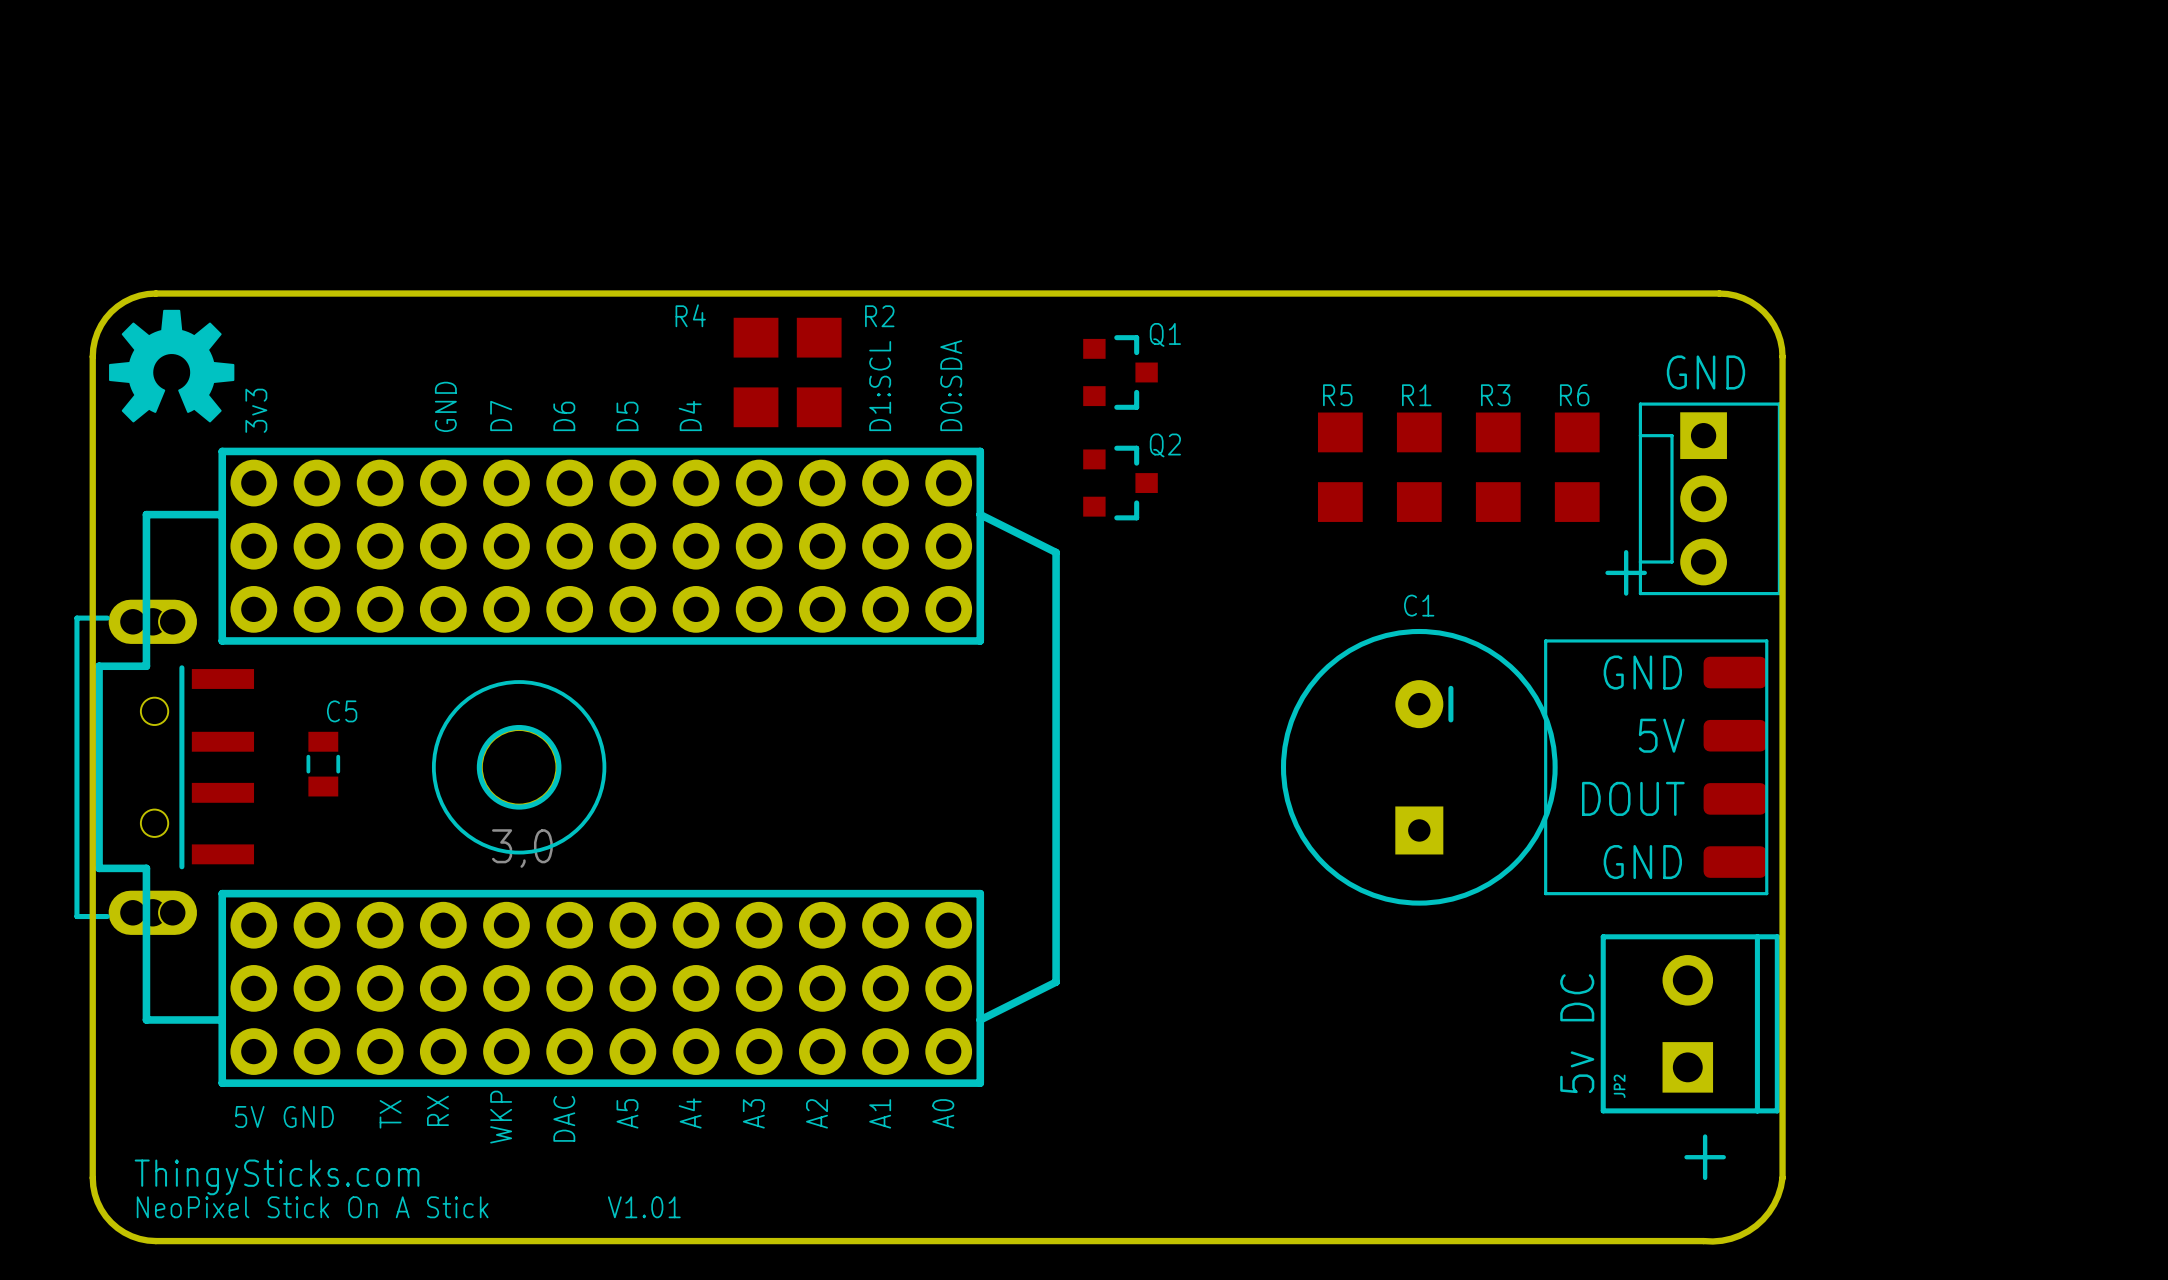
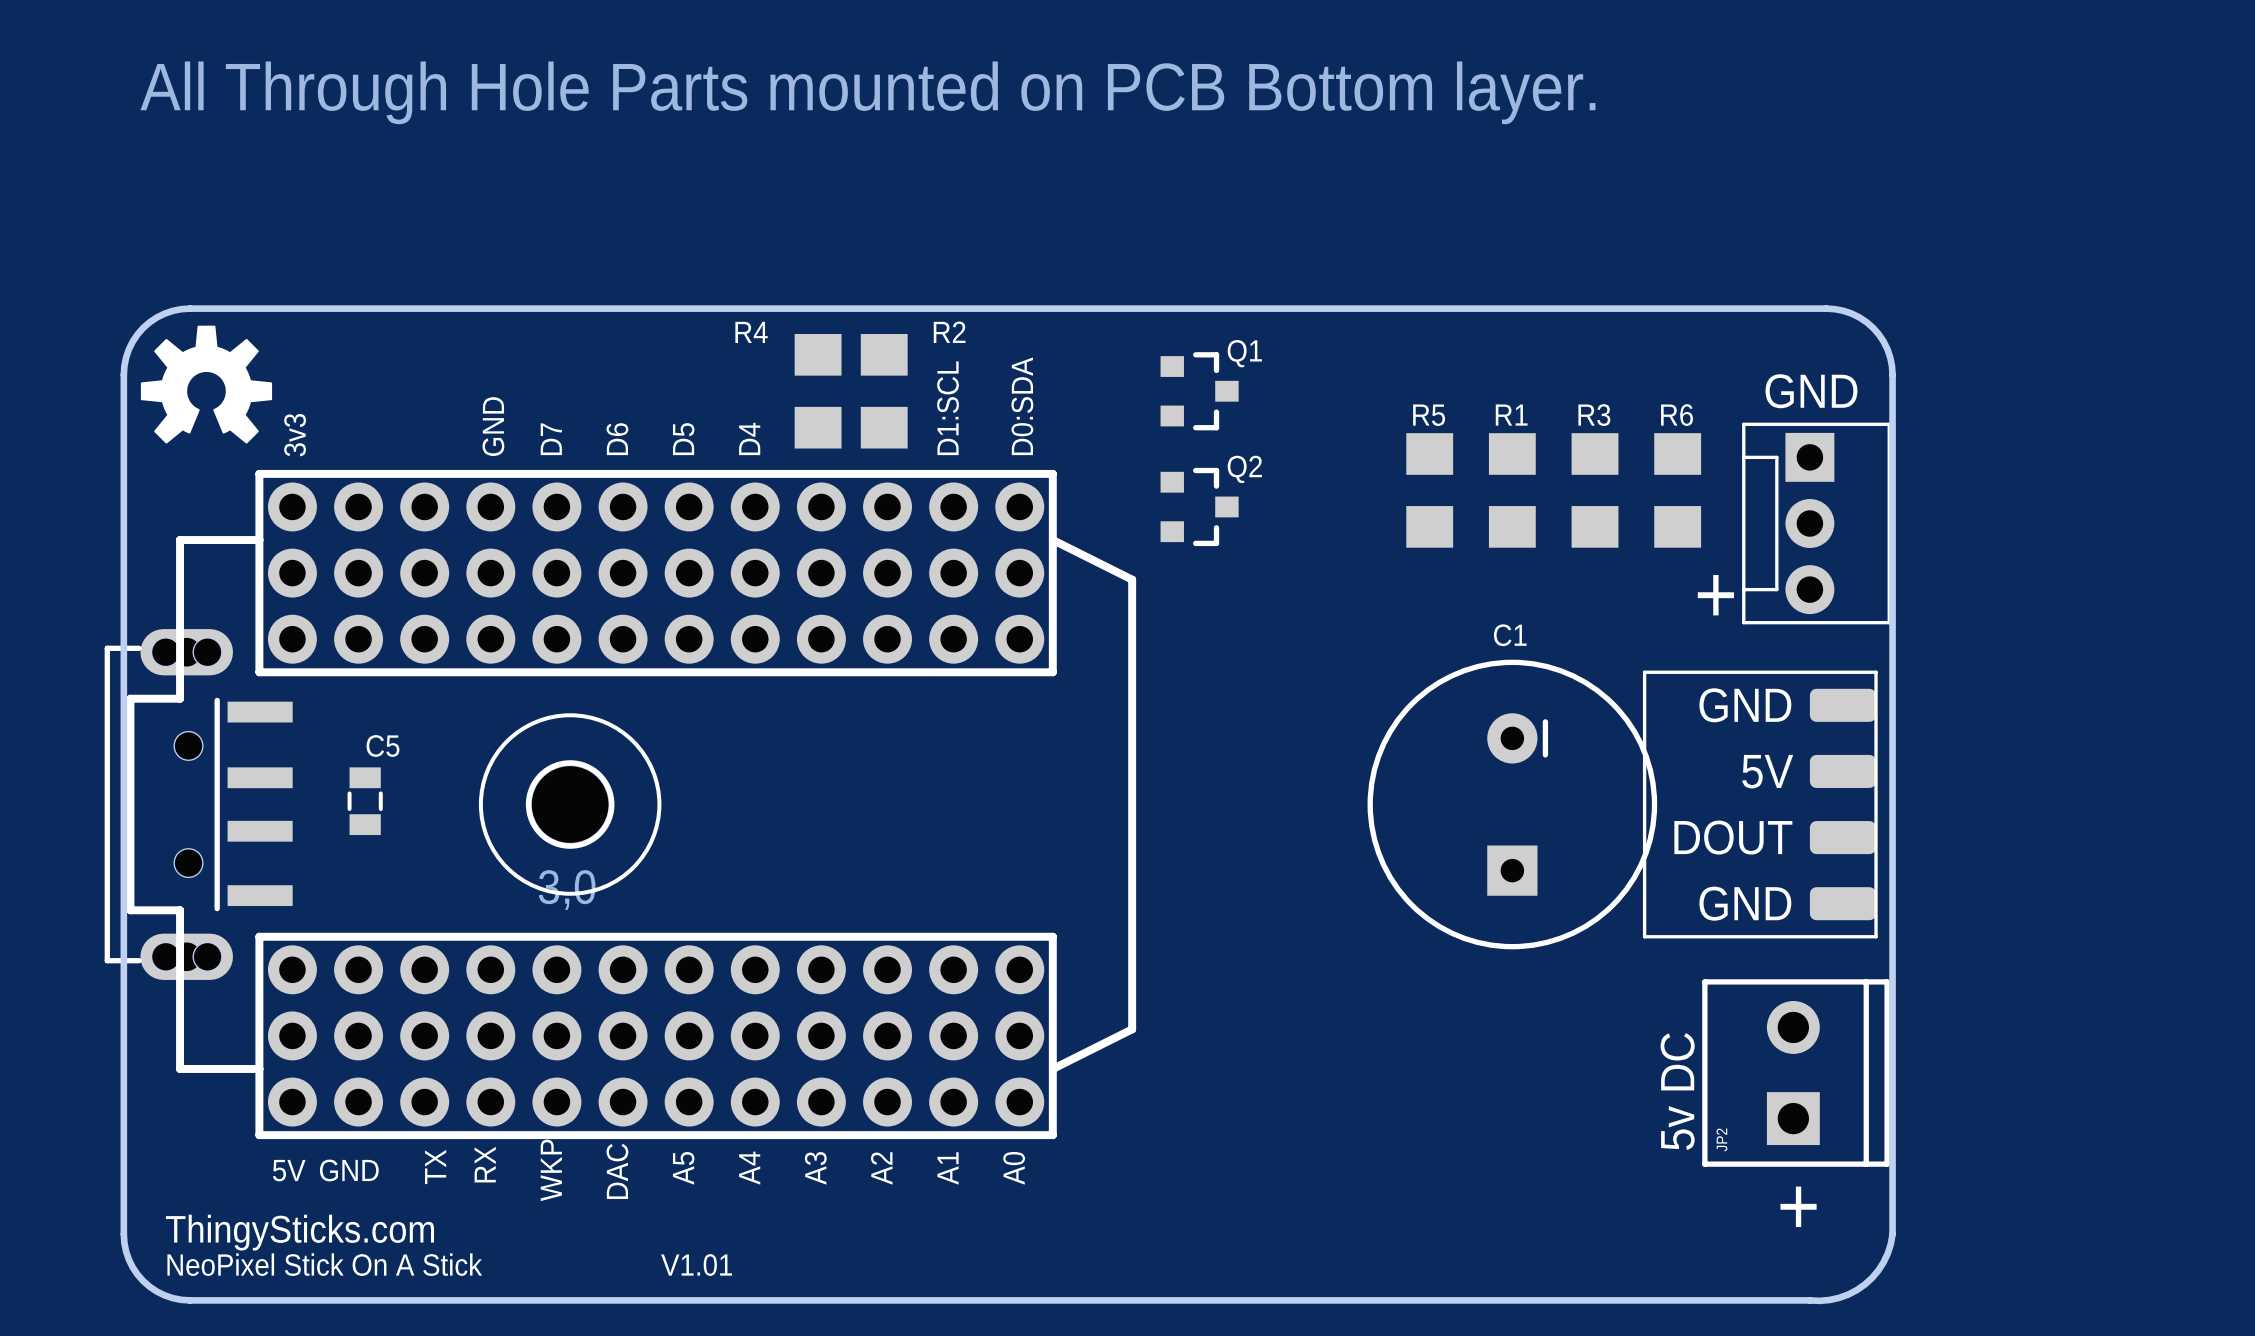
text: none -> All Through Hole Parts mounted on PCB Bottom layer. (867, 92)

